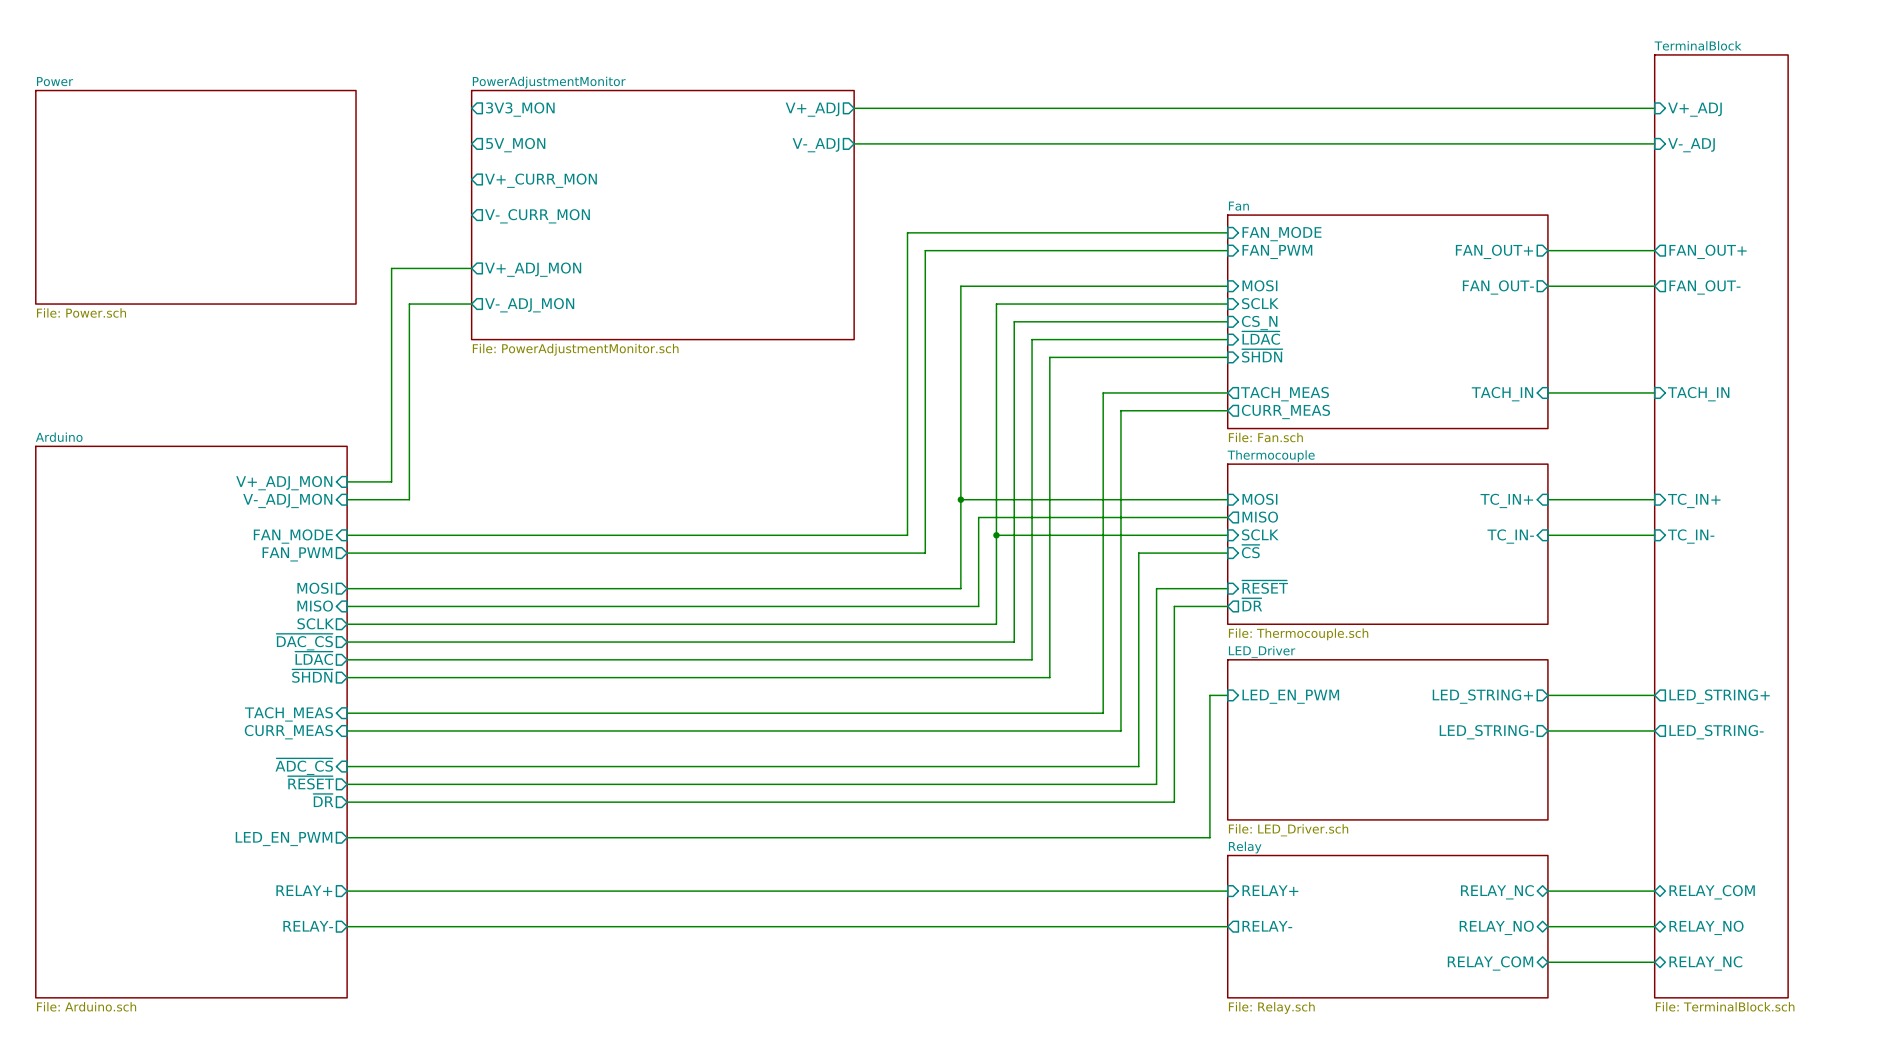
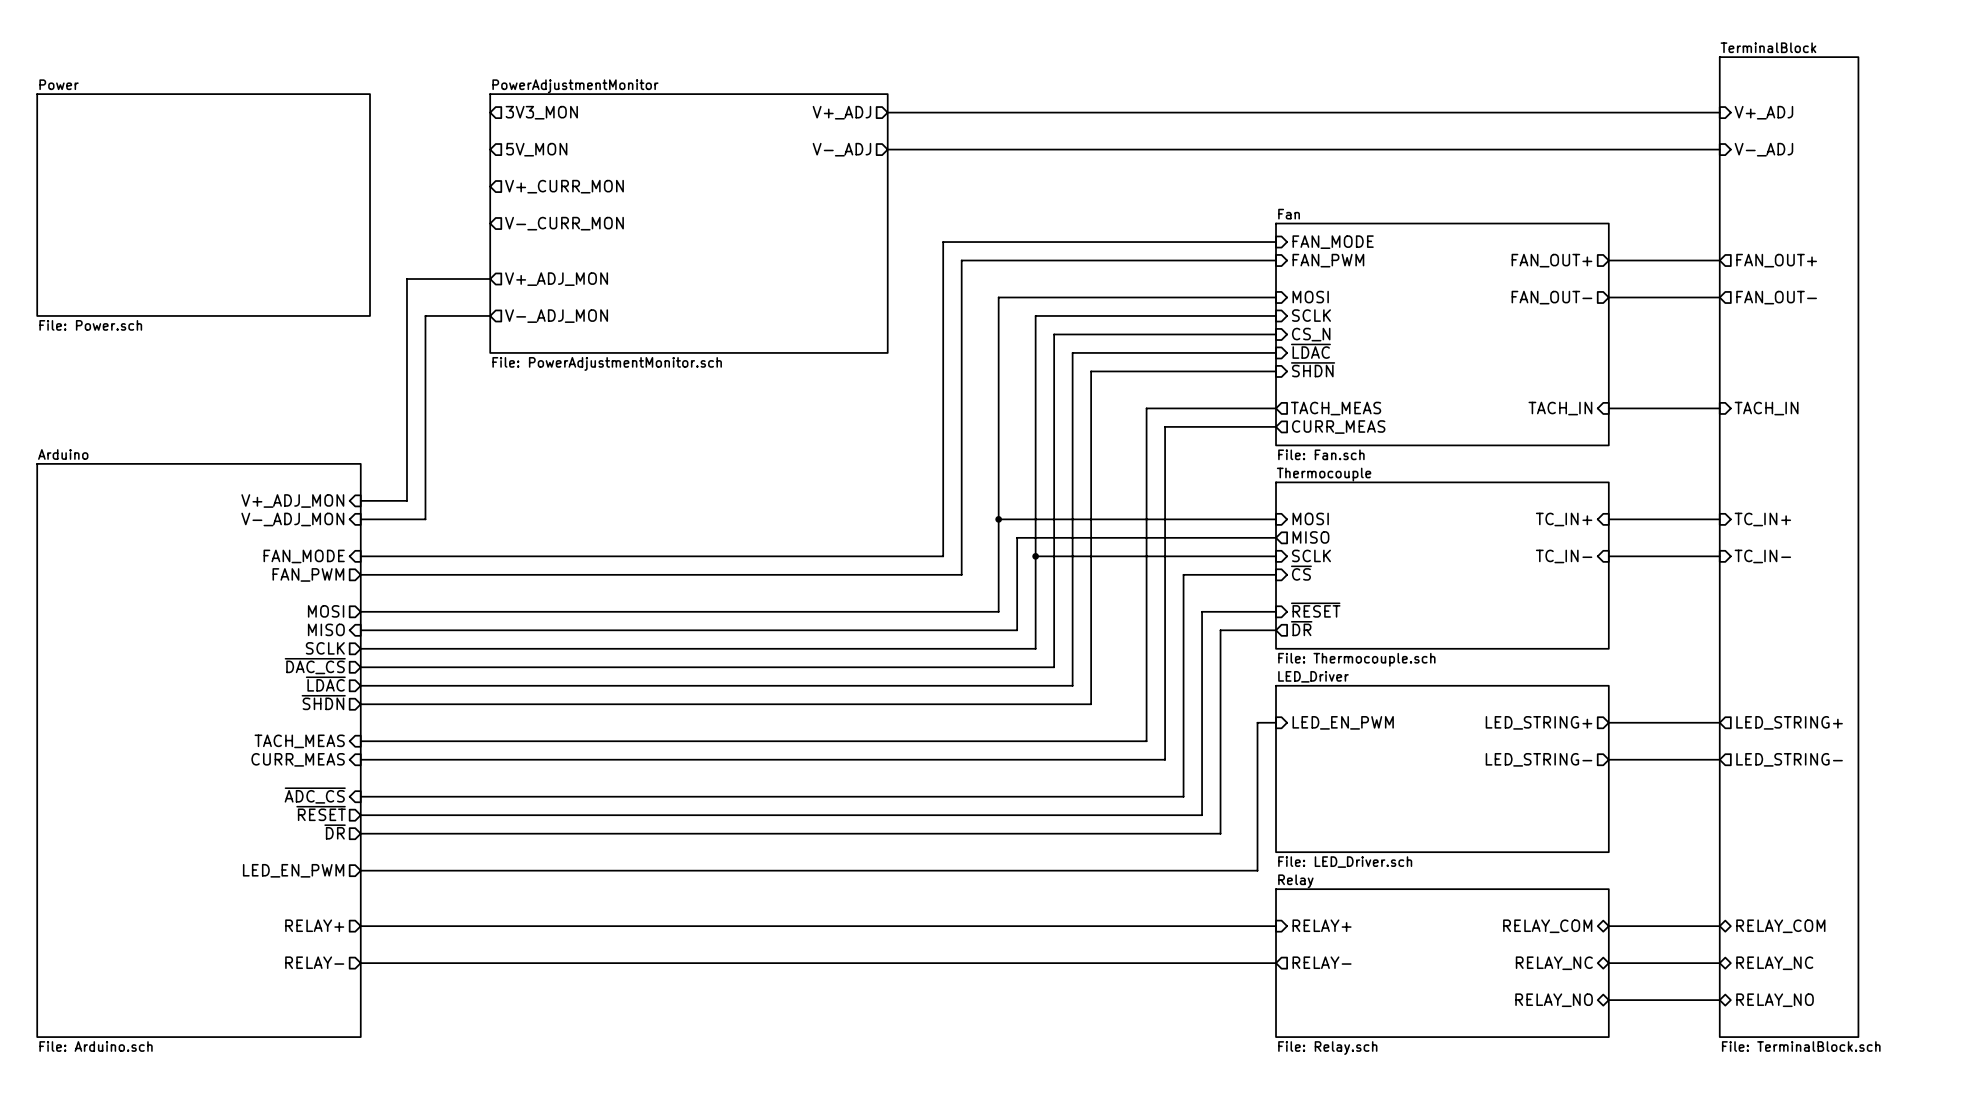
sheet pin: RELAY_NC (1497, 892) -> RELAY_COM (1547, 926)
sheet pin: RELAY_NO (1496, 927) -> RELAY_NC (1554, 963)
sheet pin: RELAY_NO (1706, 927) -> RELAY_NC (1774, 963)
sheet pin: RELAY_COM (1490, 963) -> RELAY_NO (1554, 1000)
sheet pin: RELAY_NC (1705, 963) -> RELAY_NO (1775, 1000)

